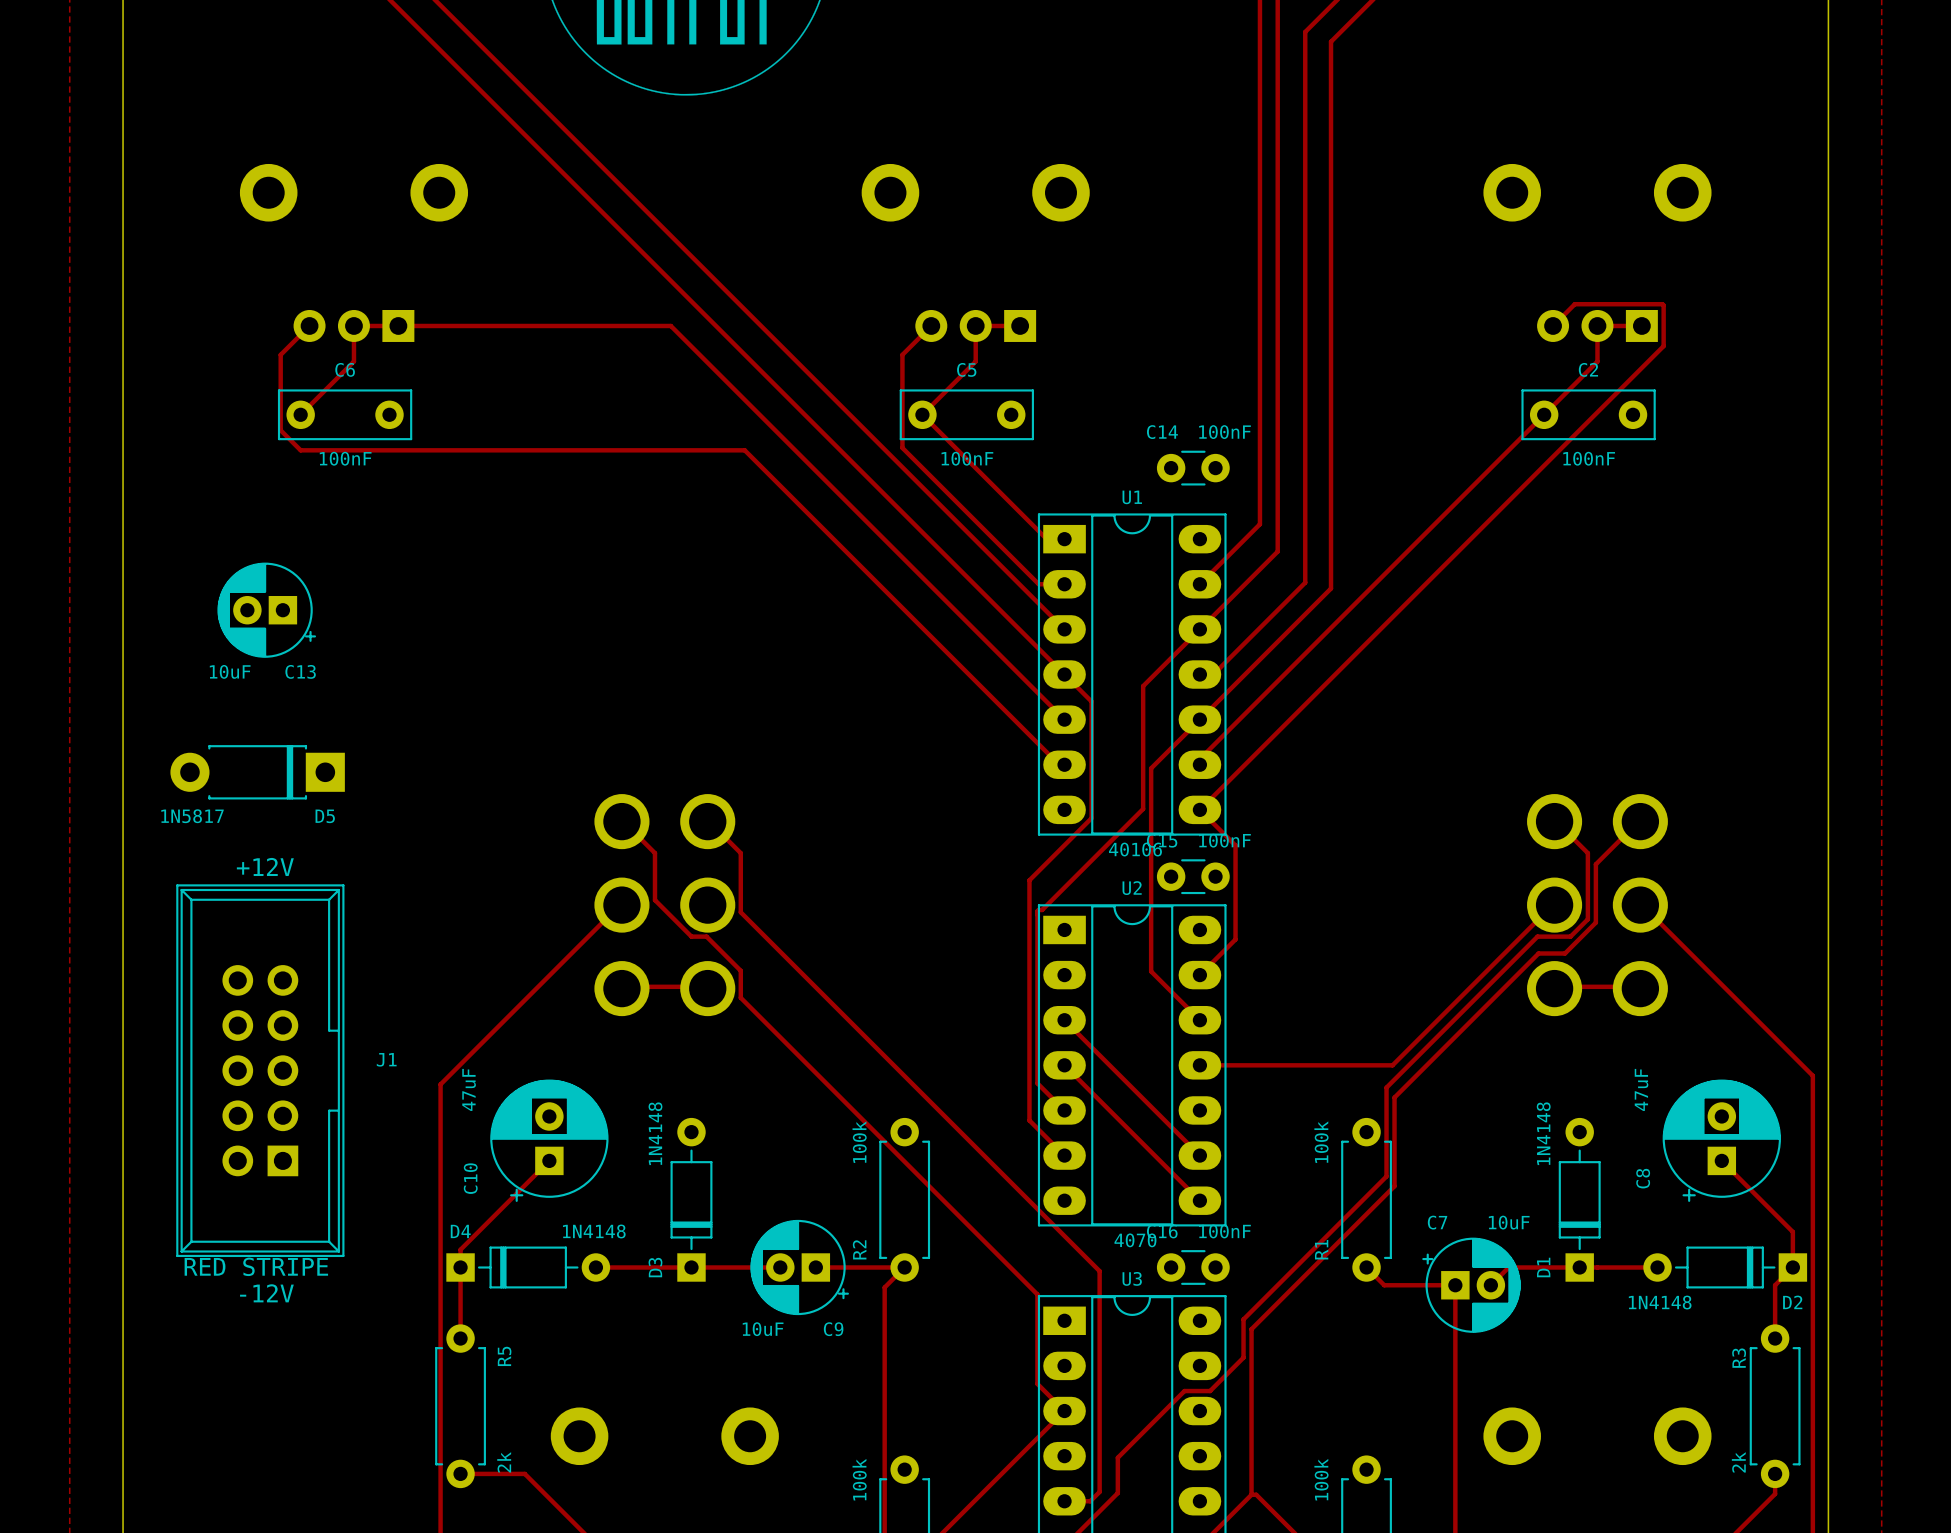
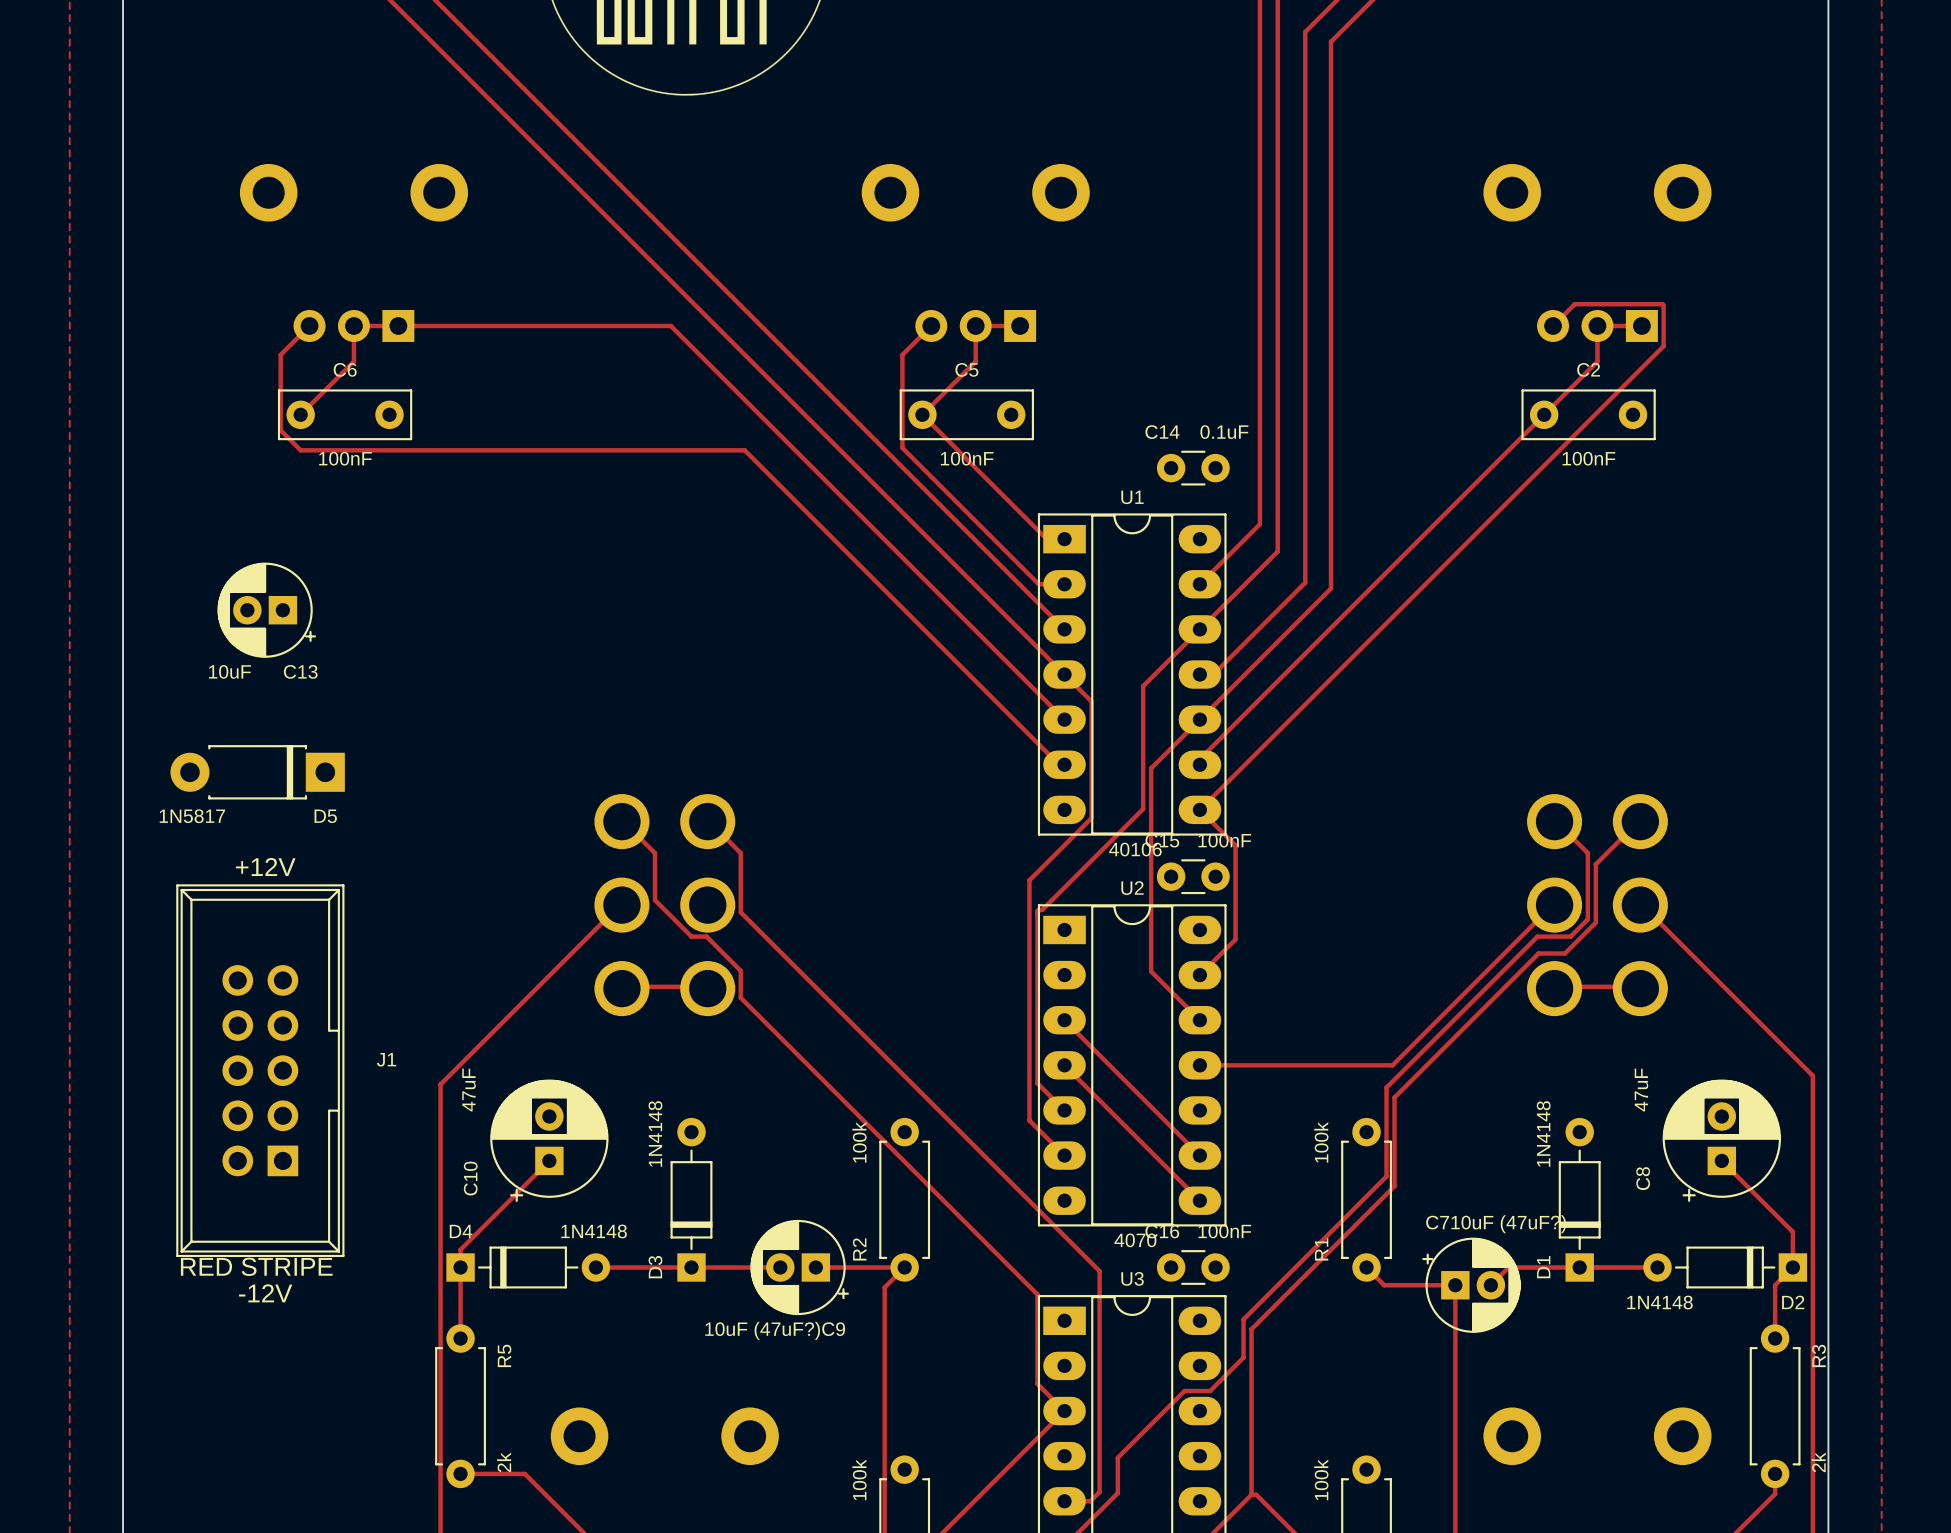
C14 value: 100nF (1224, 432) -> 0.1uF (1224, 432)
C7 value: 10uF (1509, 1222) -> 10uF (47uF?) (1508, 1224)
C9 value: 10uF (763, 1329) -> 10uF (47uF?) (762, 1330)
R3 name position: R3 (1739, 1358) -> R3 (1819, 1355)
R3 value position: 2k (1738, 1462) -> 2k (1818, 1462)

